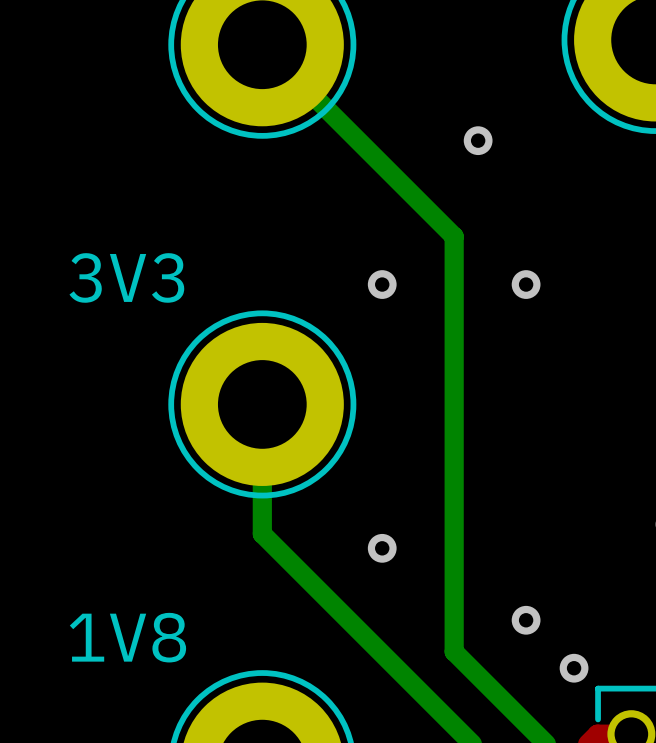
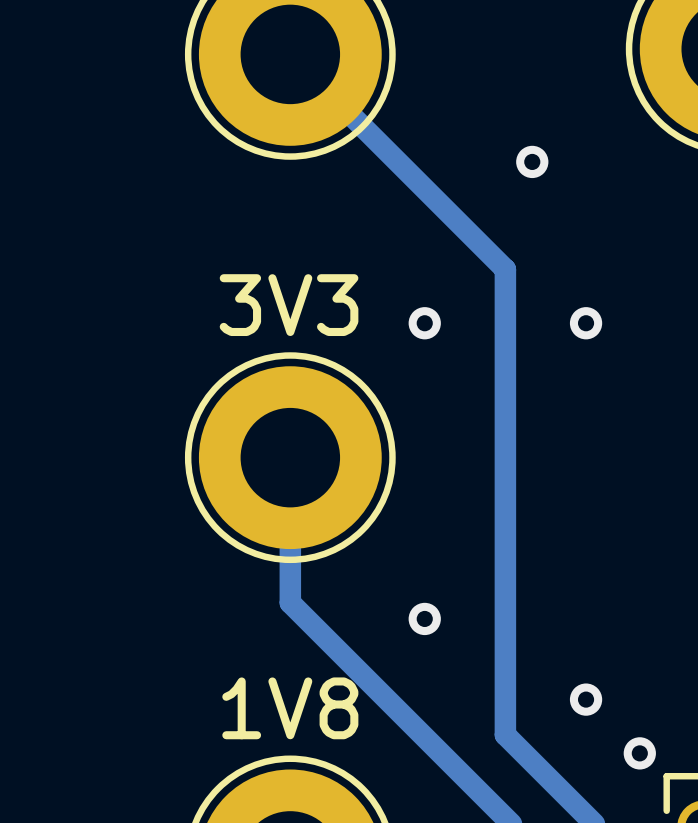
part value position: 3V3 (126, 277) -> 3V3 (289, 305)
part value position: 1V8 (127, 637) -> 1V8 (290, 708)

